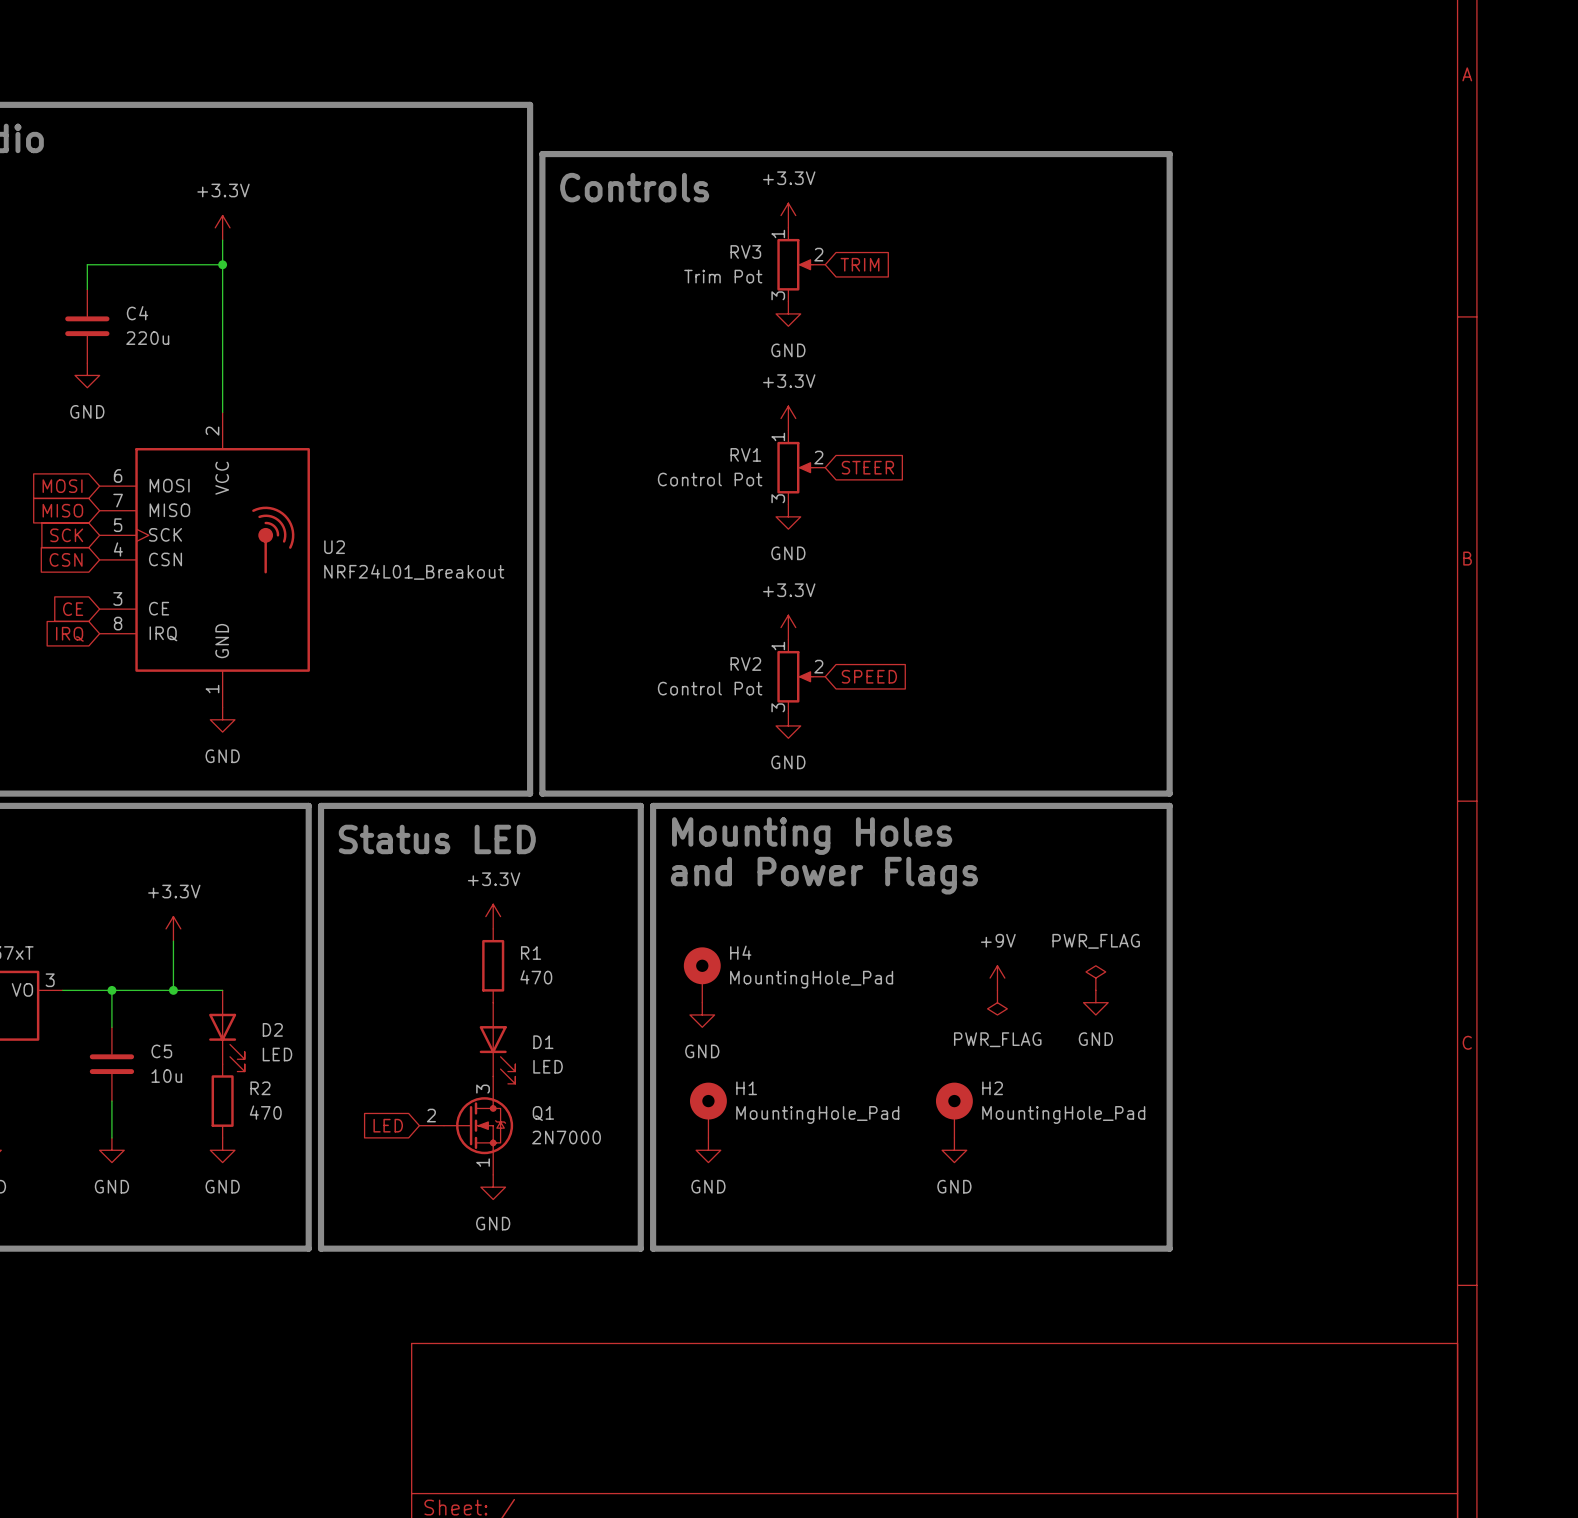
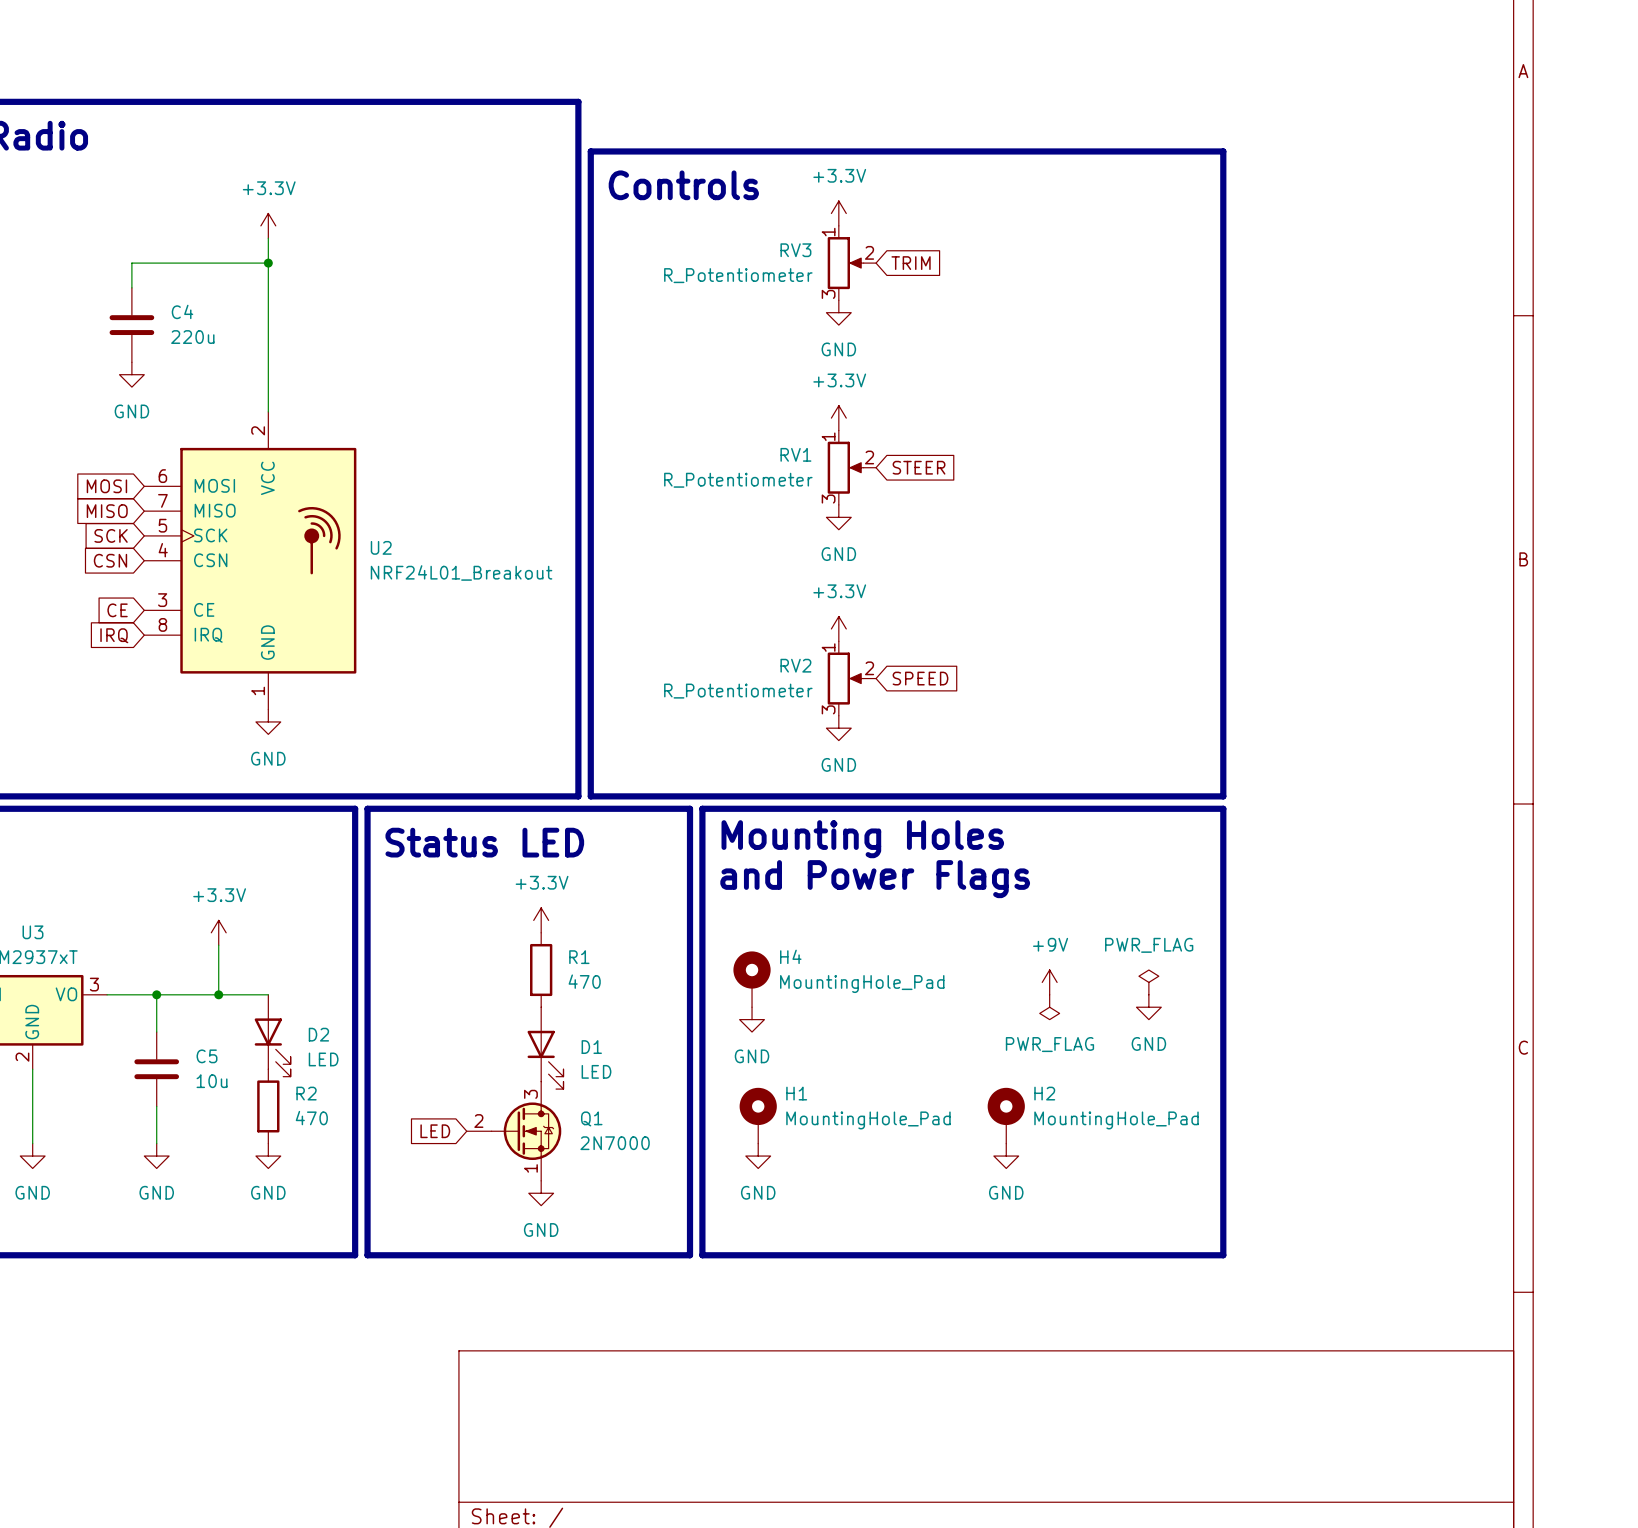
RV3 value: Trim Pot (723, 276) -> R_Potentiometer (738, 275)
RV1 value: Control Pot (710, 479) -> R_Potentiometer (738, 480)
RV2 value: Control Pot (710, 688) -> R_Potentiometer (738, 691)

